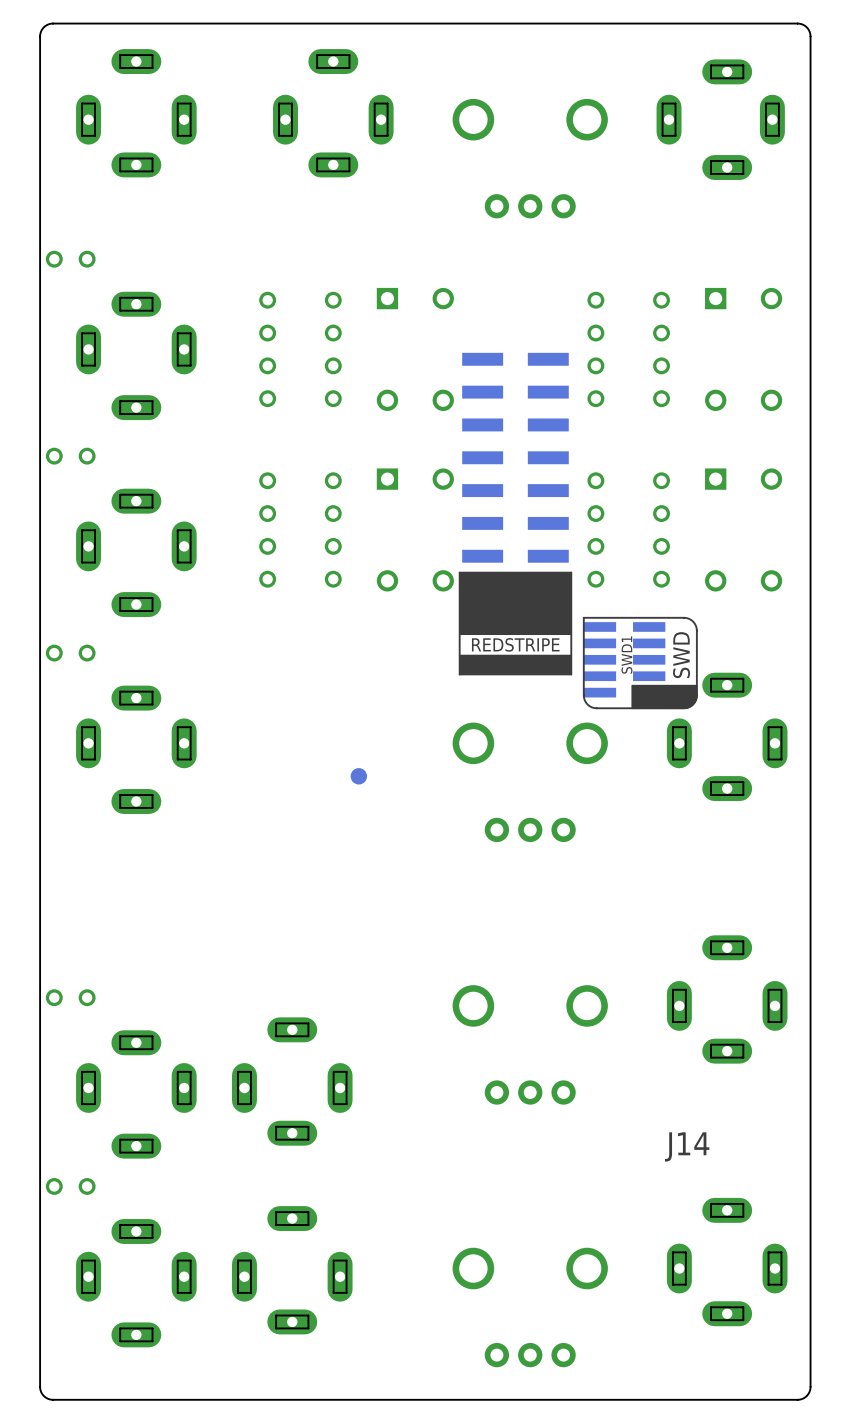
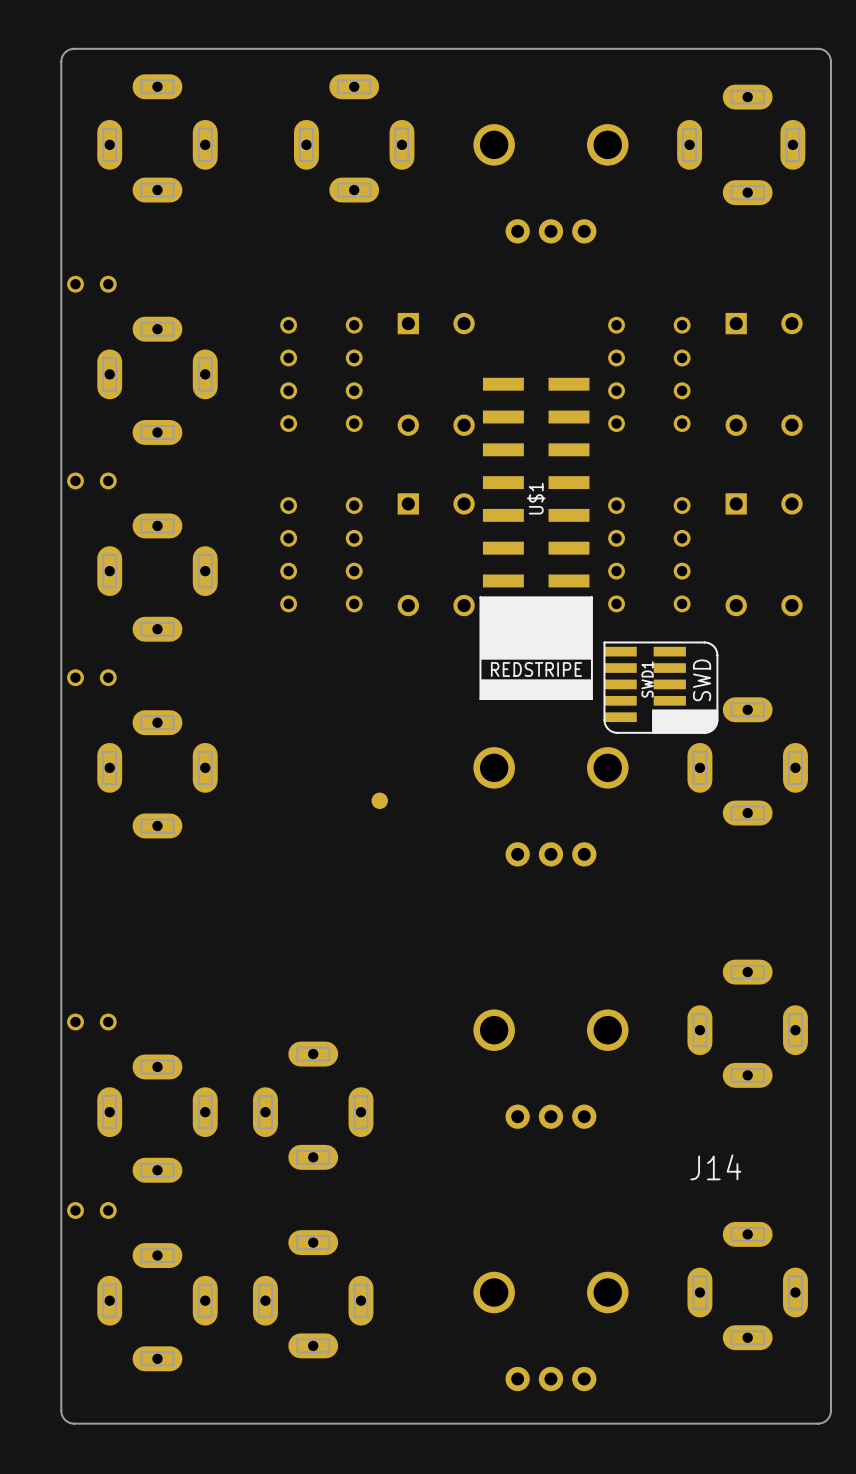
U$1 name: none -> U$1 (536, 498)

